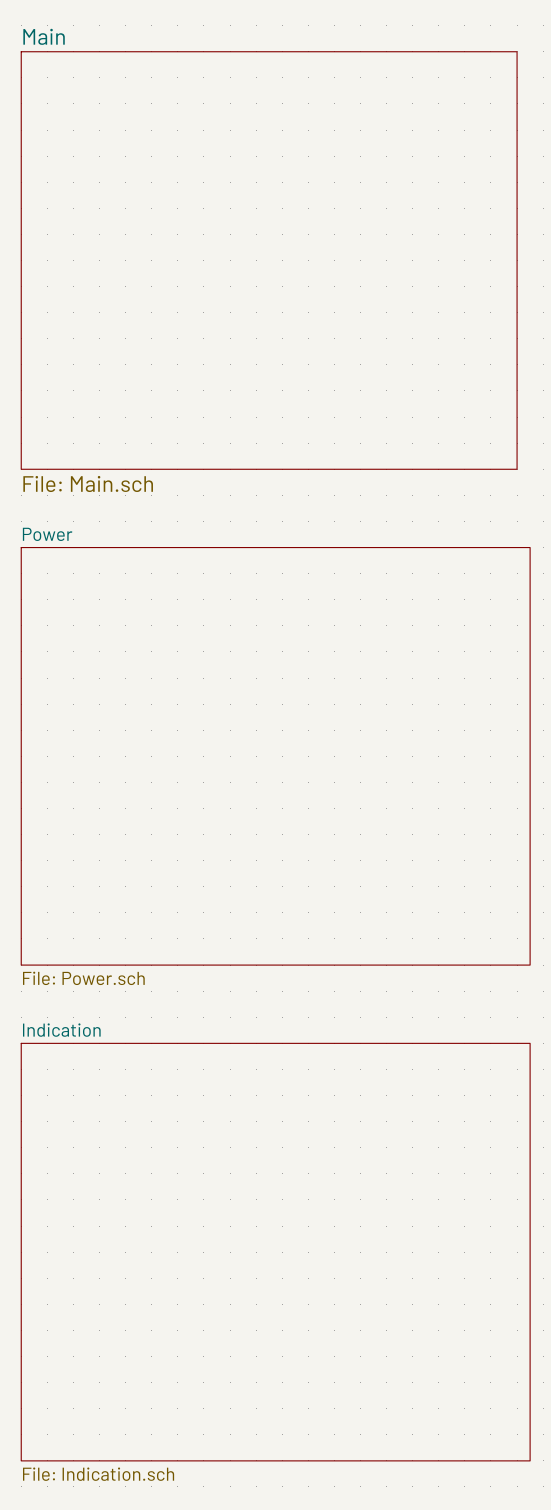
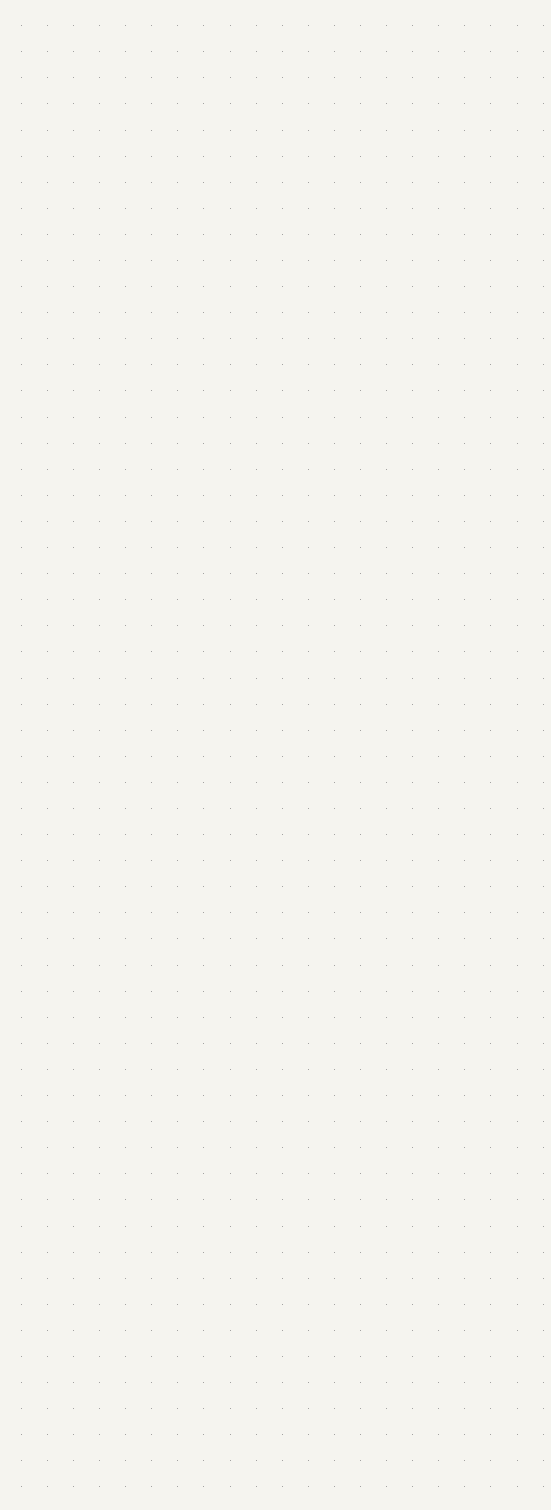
sheet Main: File: Main.sch (269, 260) -> none
sheet Power: File: Power.sch (275, 756) -> none
sheet Indication: File: Indication.sch (275, 1252) -> none

